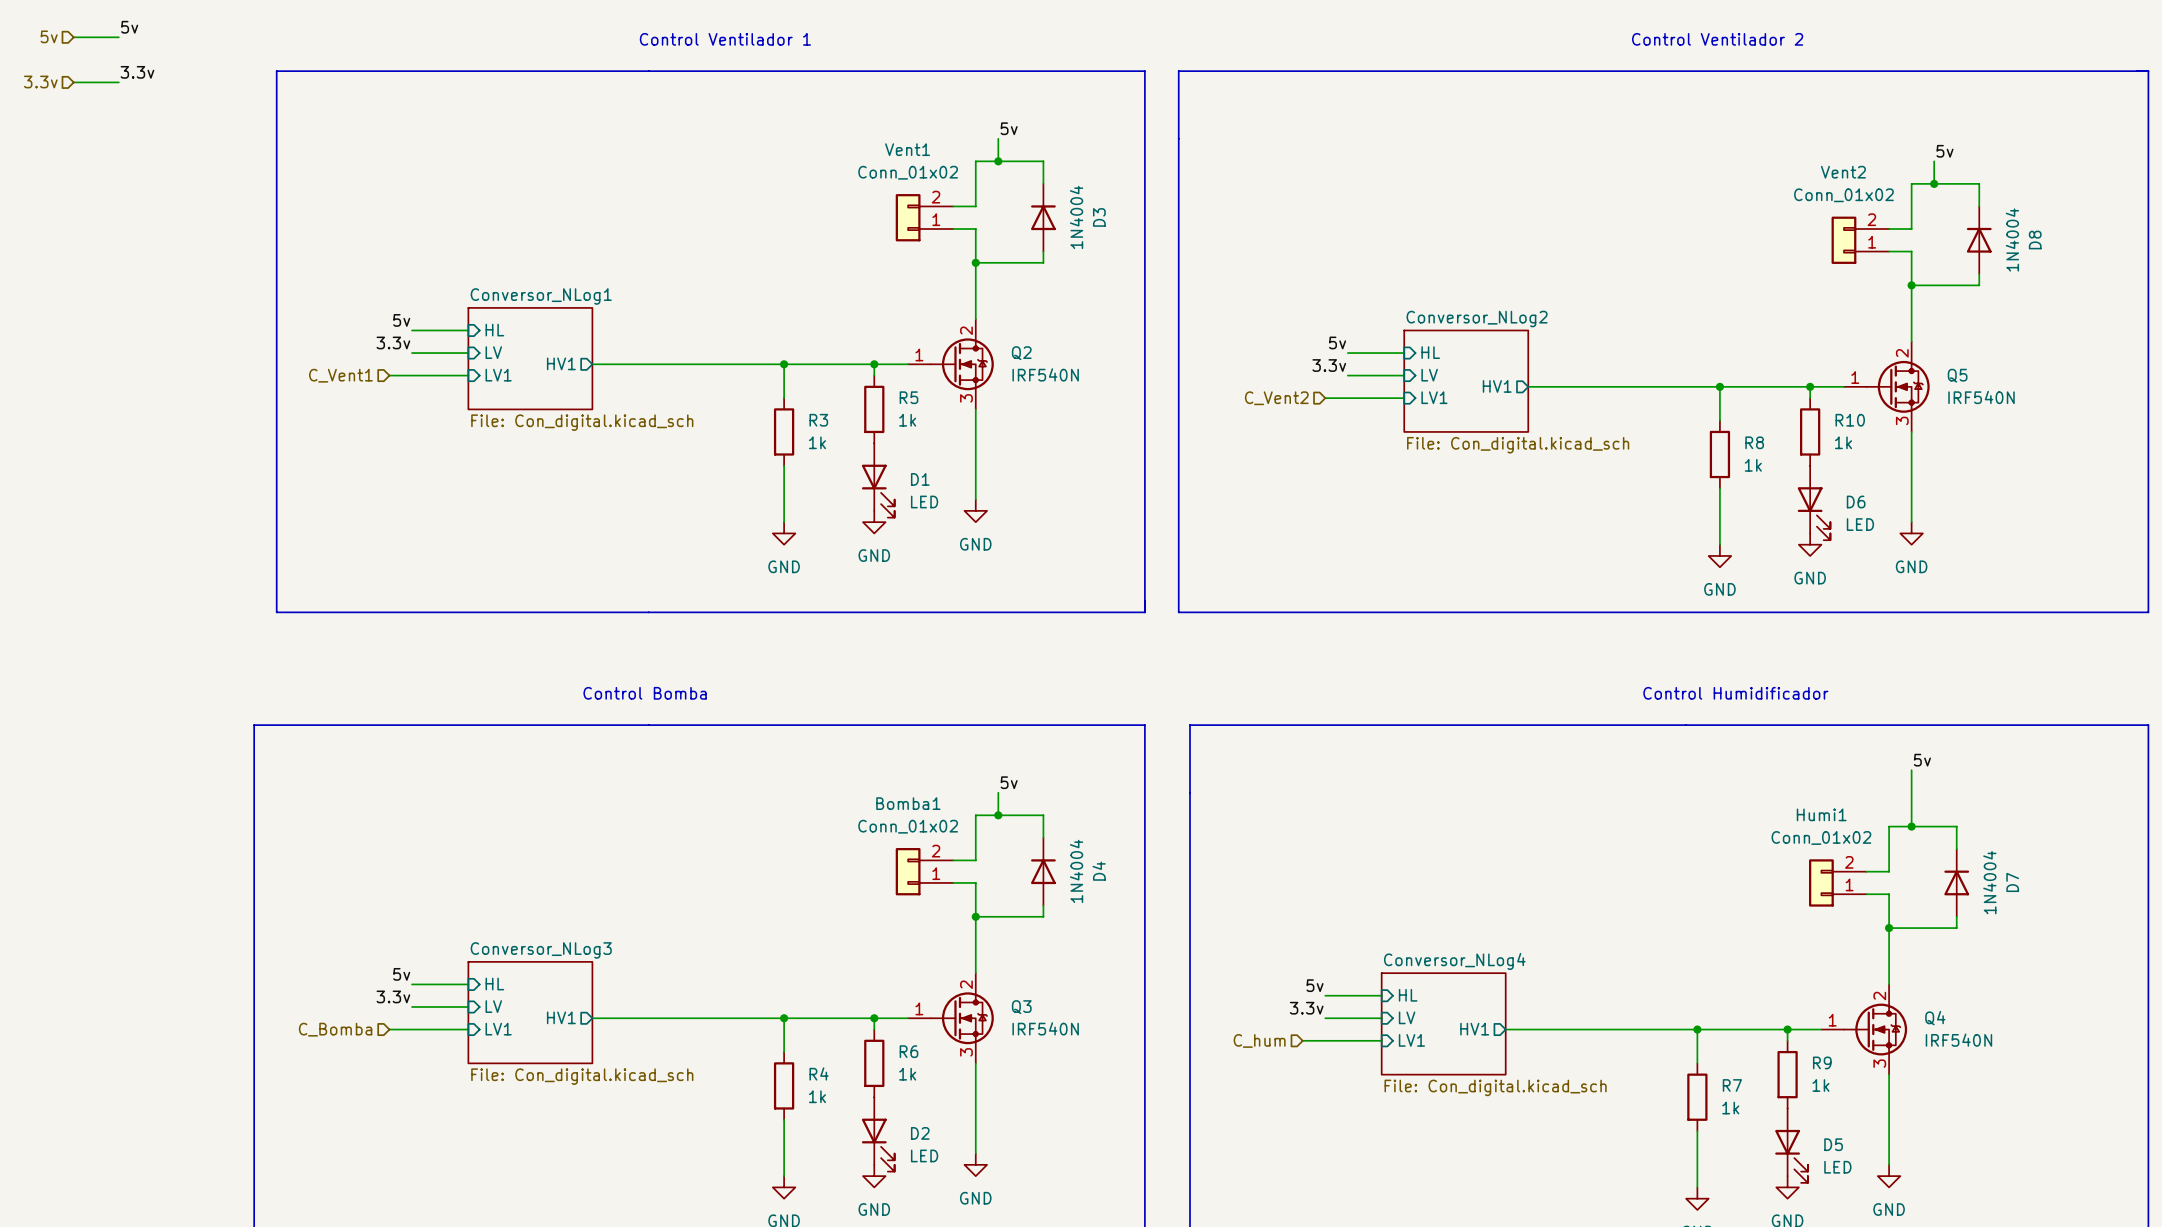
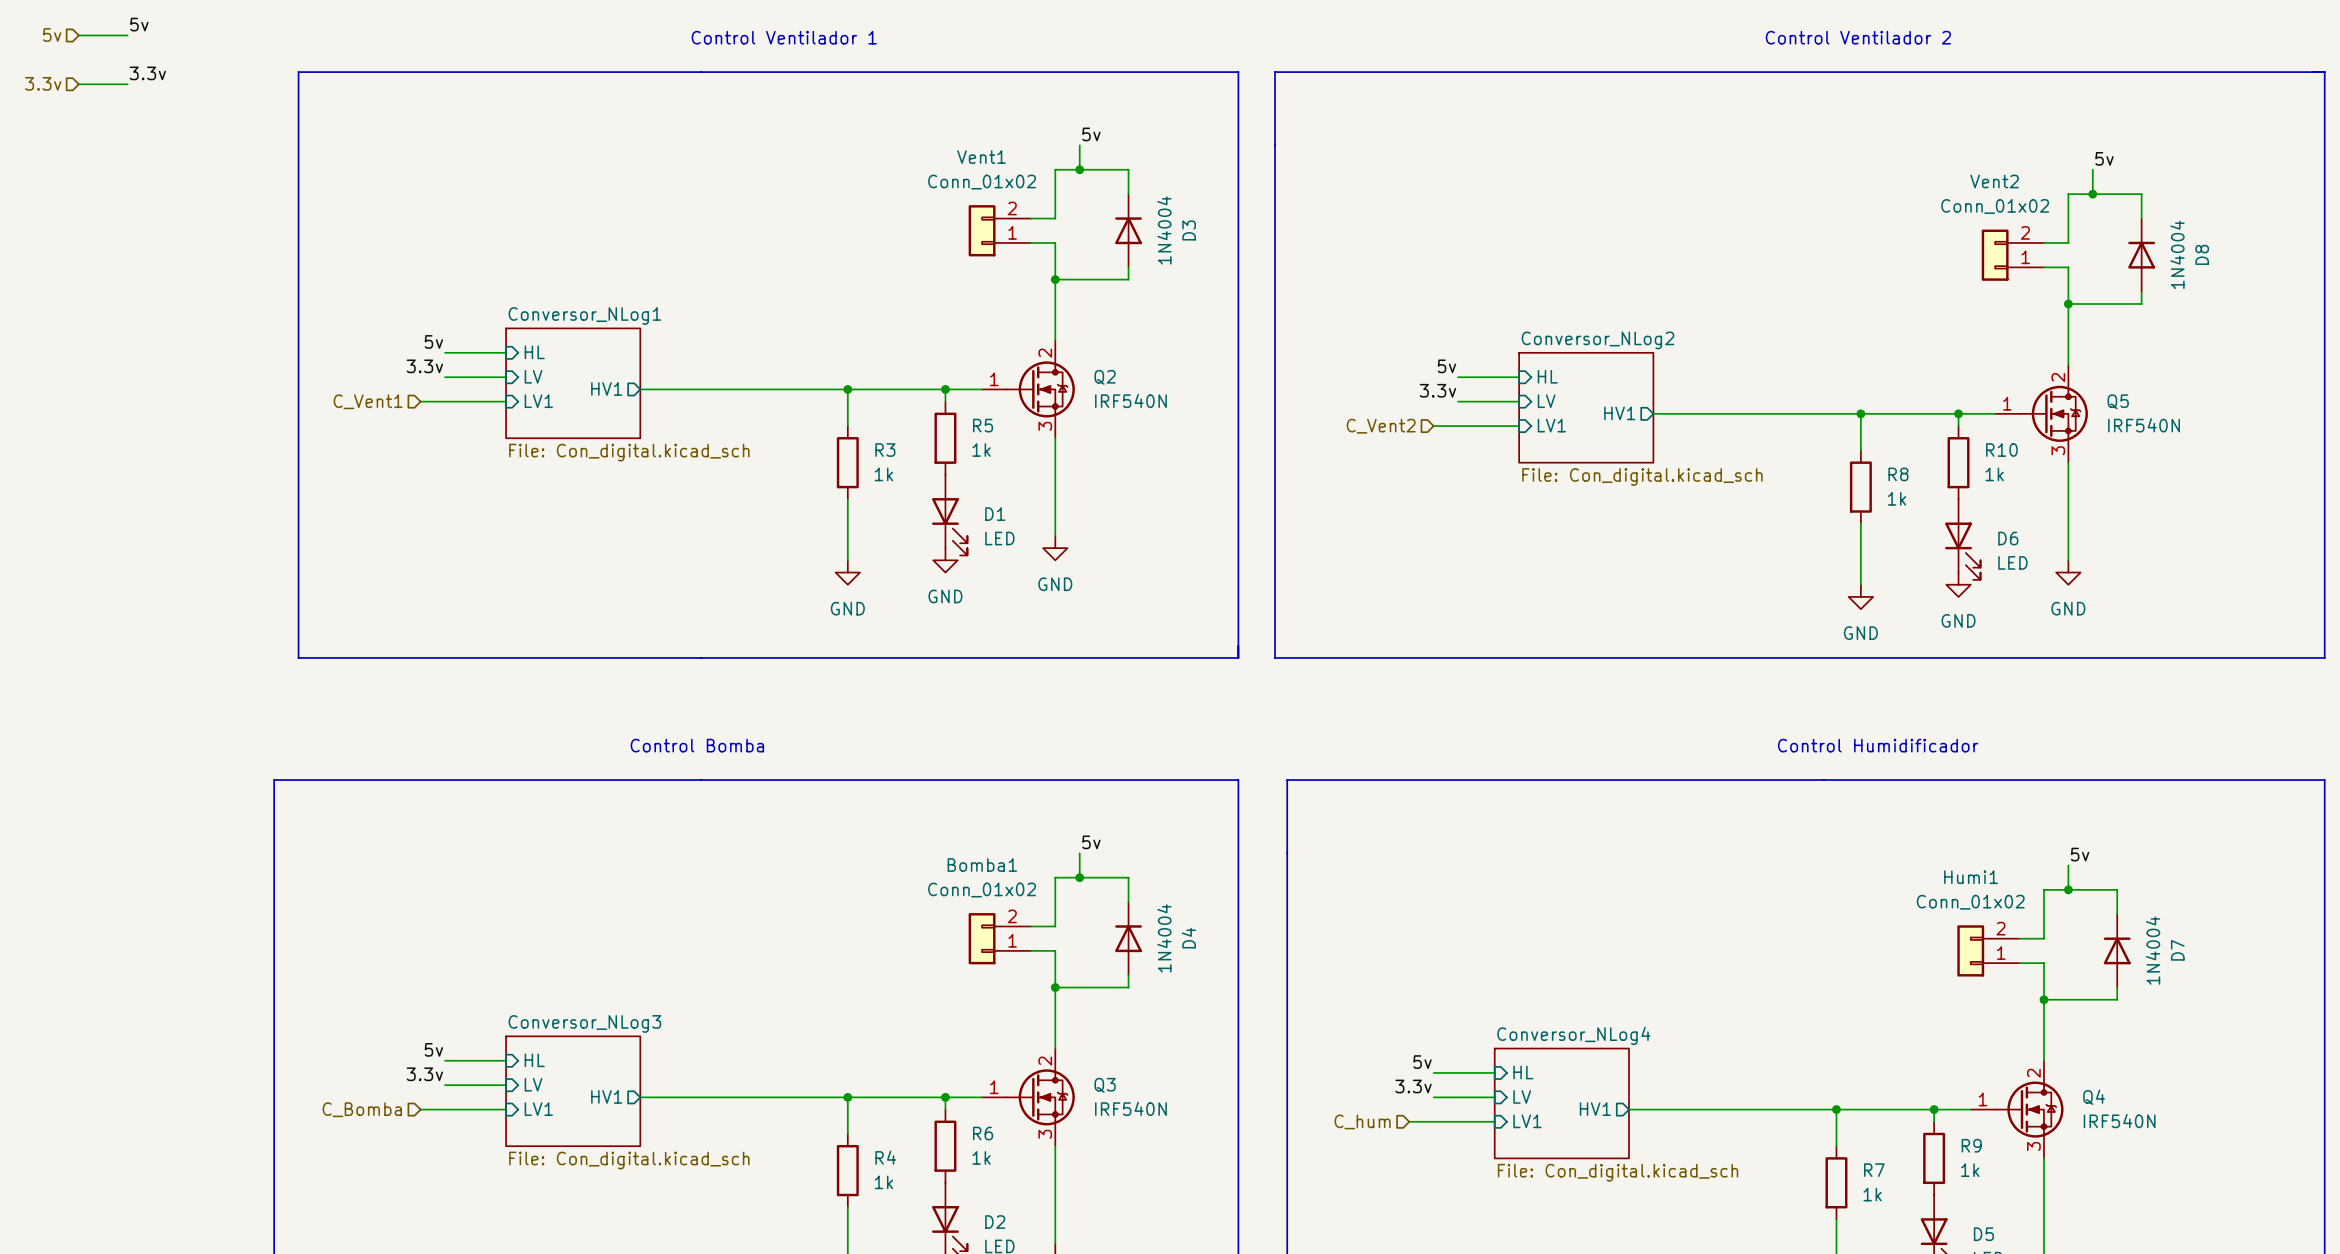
label position: 5v (1922, 760) -> 5v (2080, 854)
wire: (1911, 770) (1911, 804) -> none

